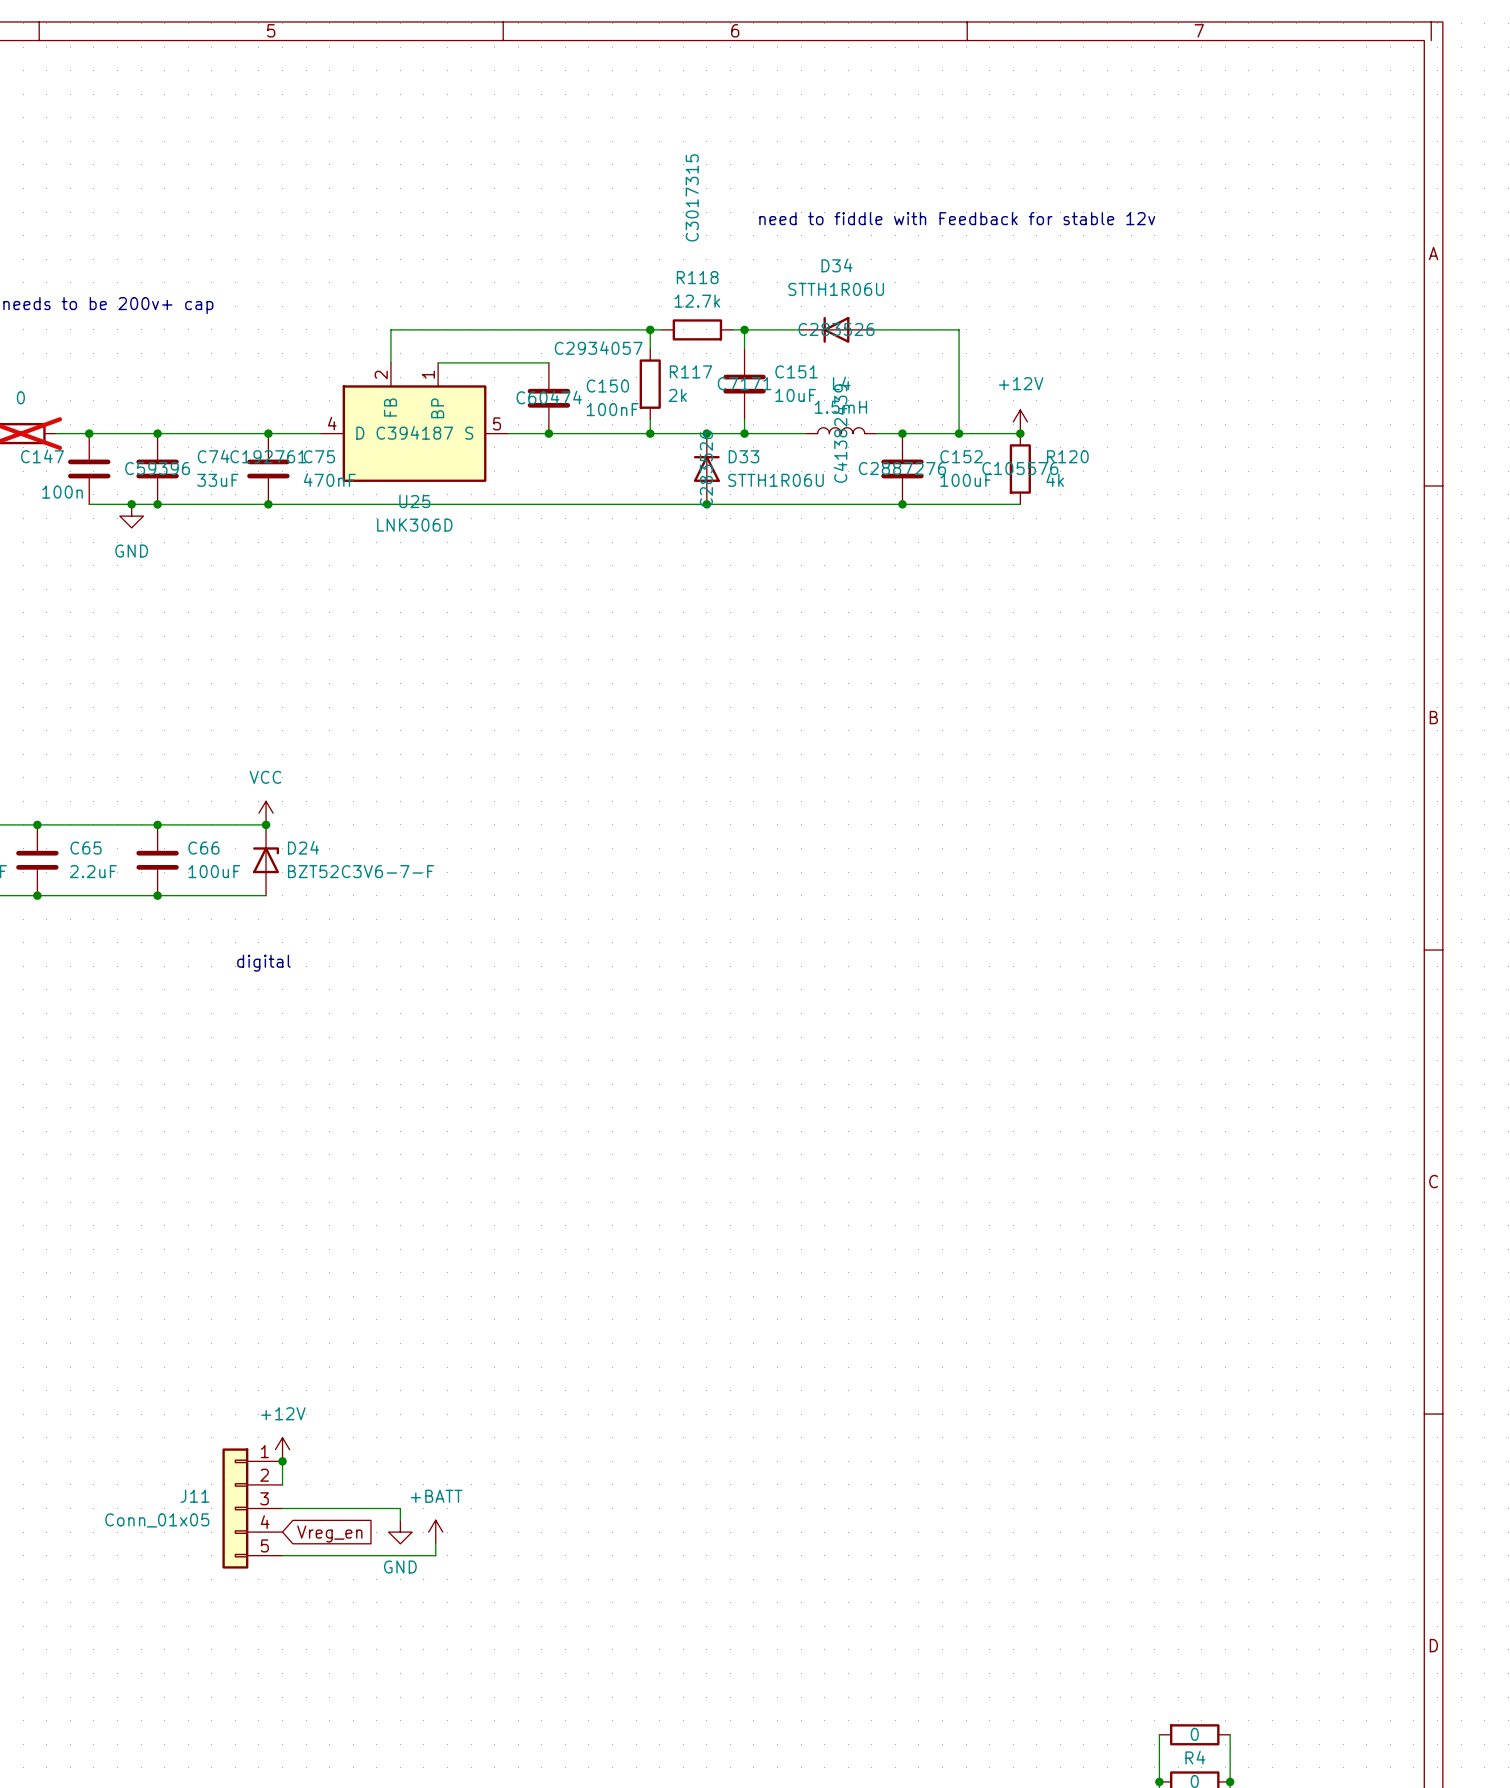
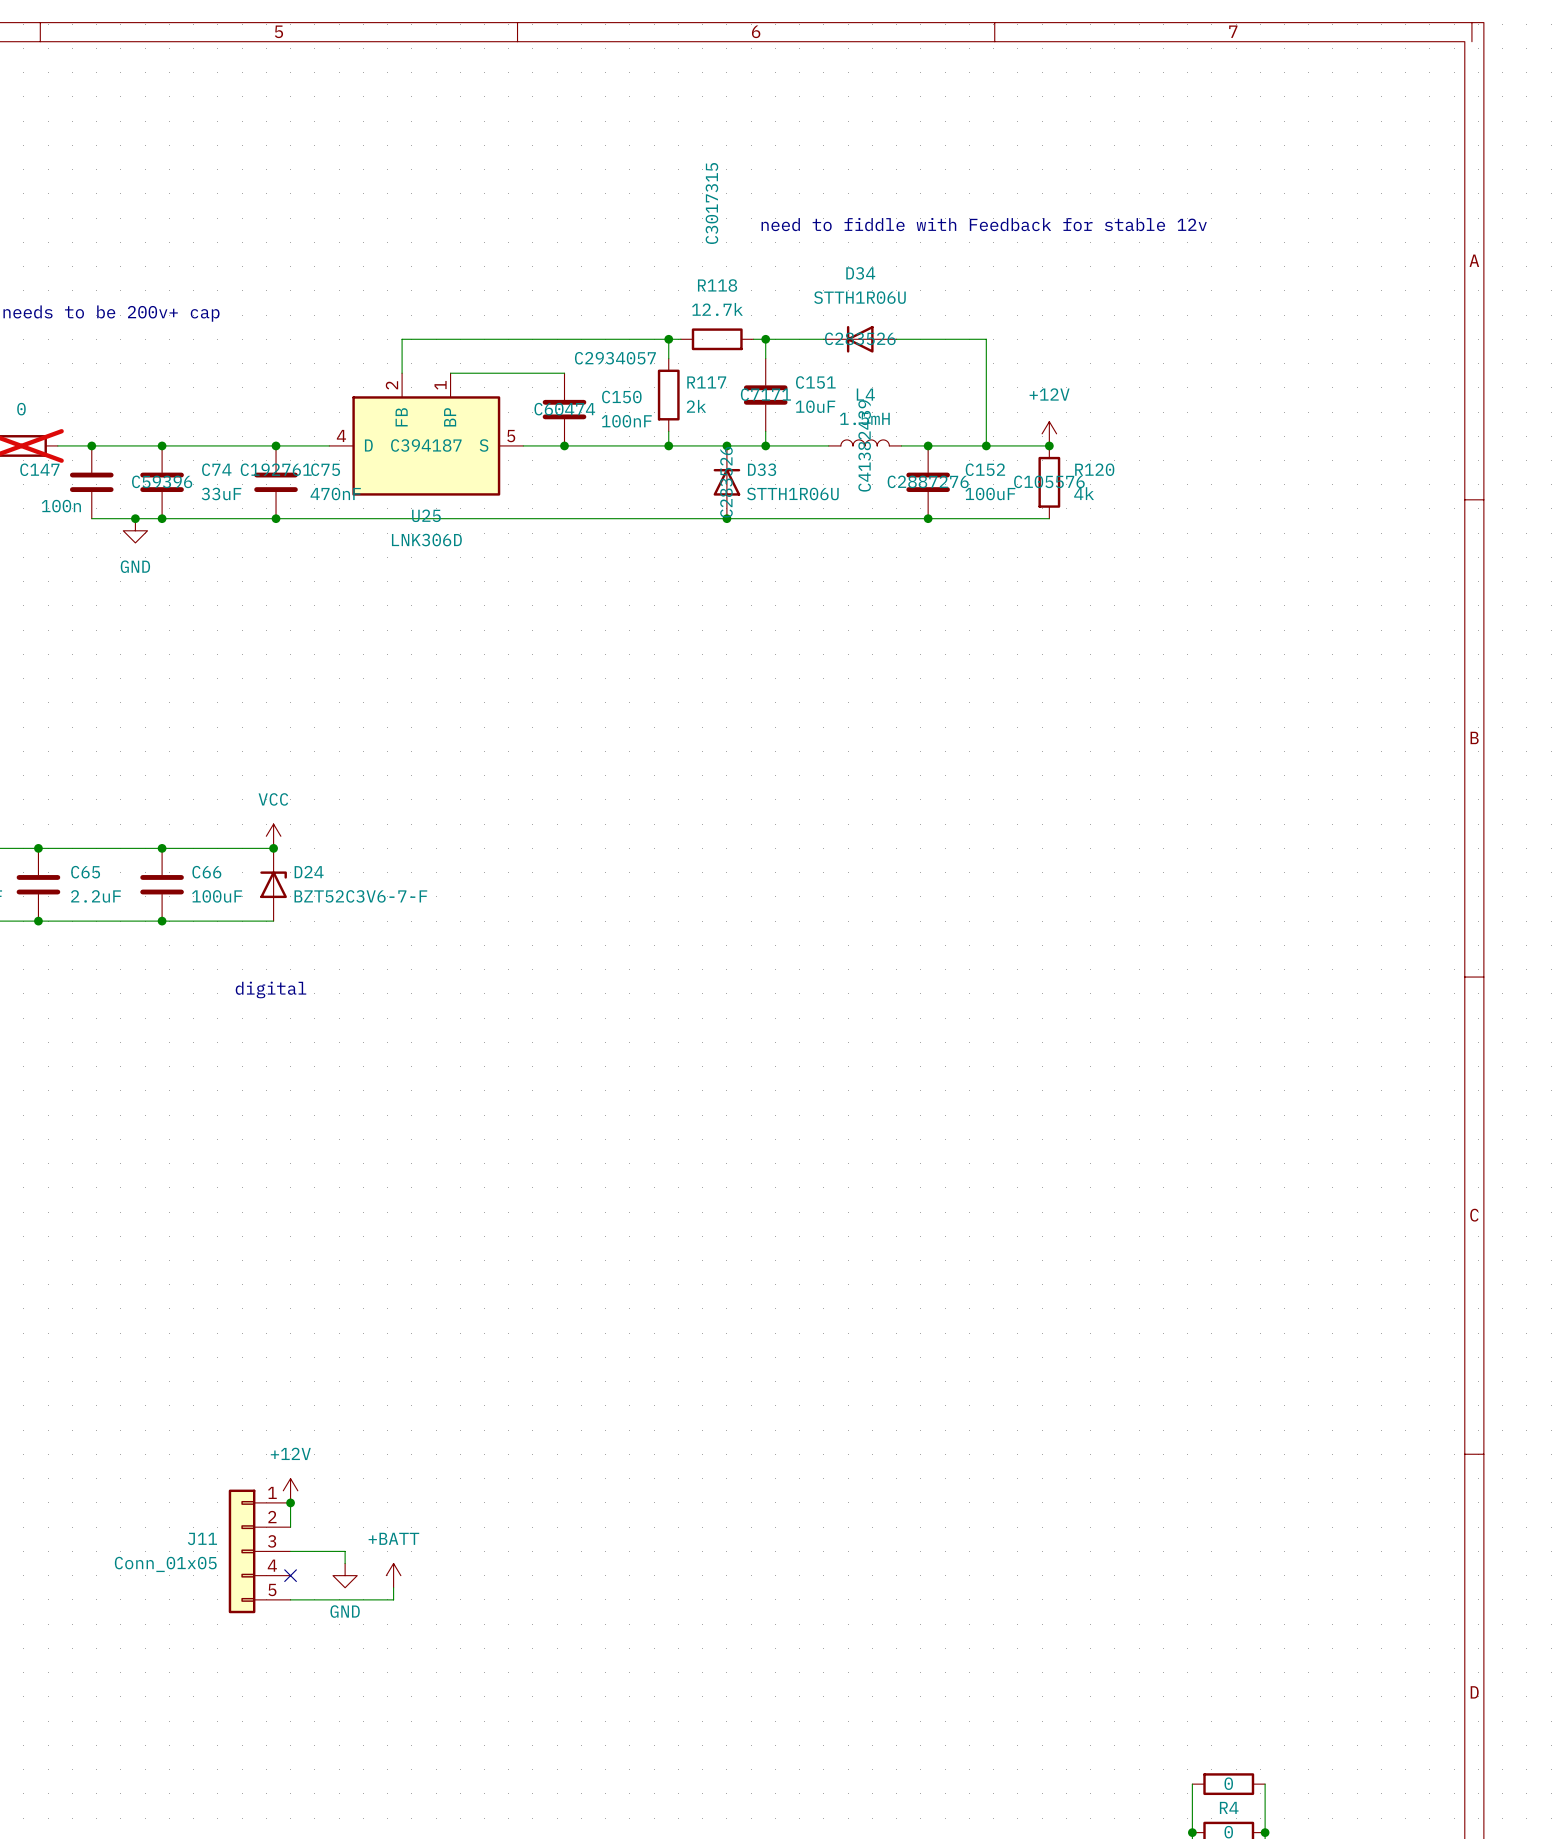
wire: (335, 1508) (400, 1508) (400, 1520) -> (345, 1551) (345, 1563)
no-connect mark: none -> (290, 1575)
power symbol position: GND (400, 1532) -> GND (345, 1575)
power symbol position: +BATT (435, 1532) -> +BATT (393, 1575)
global label: Vreg_en (329, 1534) -> none
wire: (435, 1543) (435, 1555) (382, 1555) -> (393, 1587) (393, 1599)

